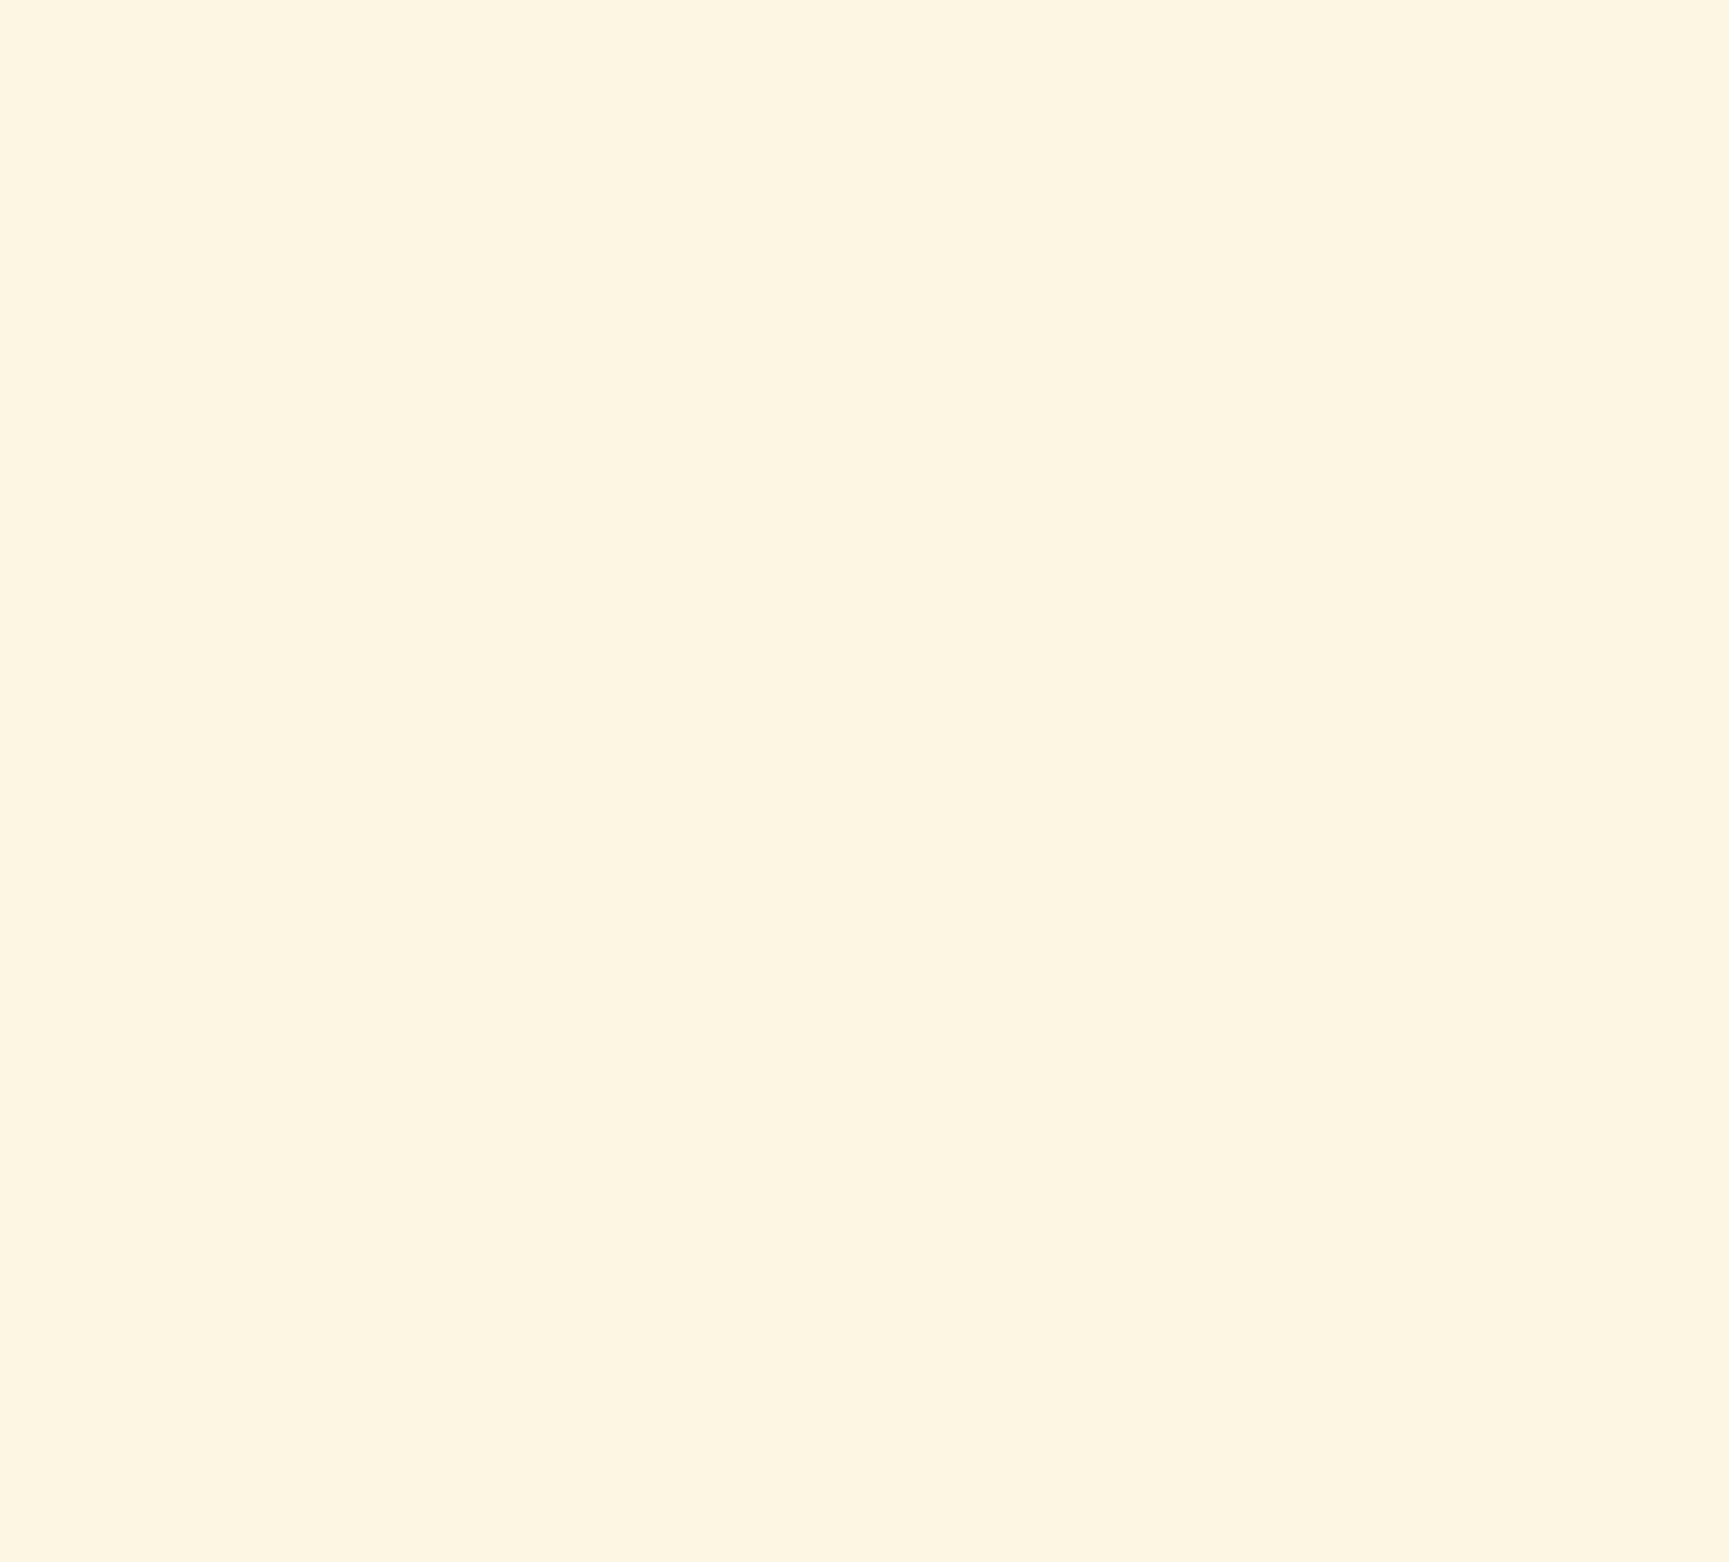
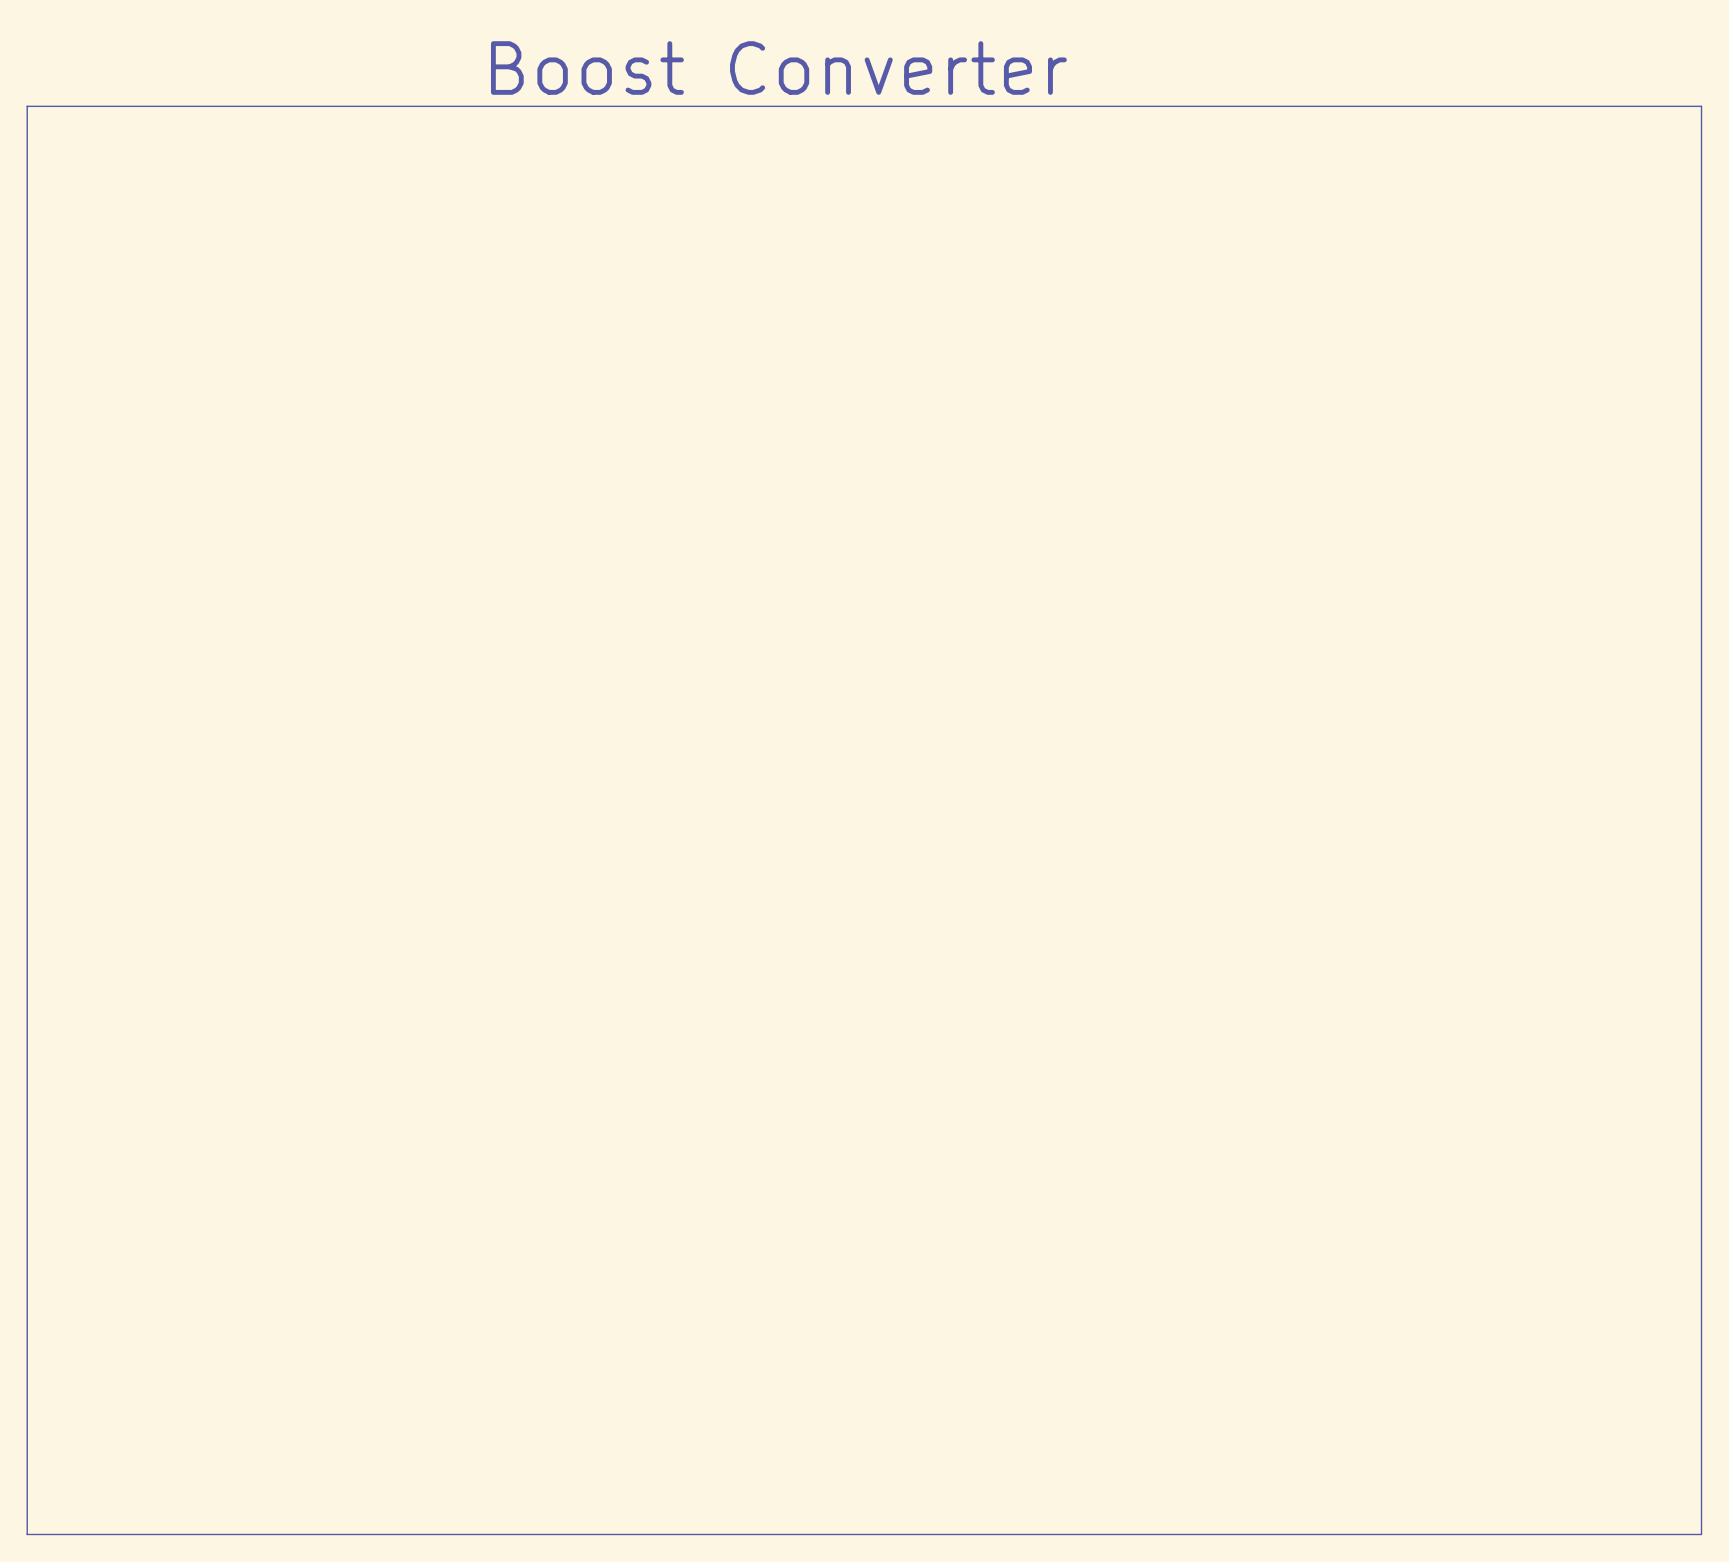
text: none -> Boost Converter (778, 68)
line: none -> (27, 106) (1701, 106) (1701, 1534) (27, 1534) (27, 106)

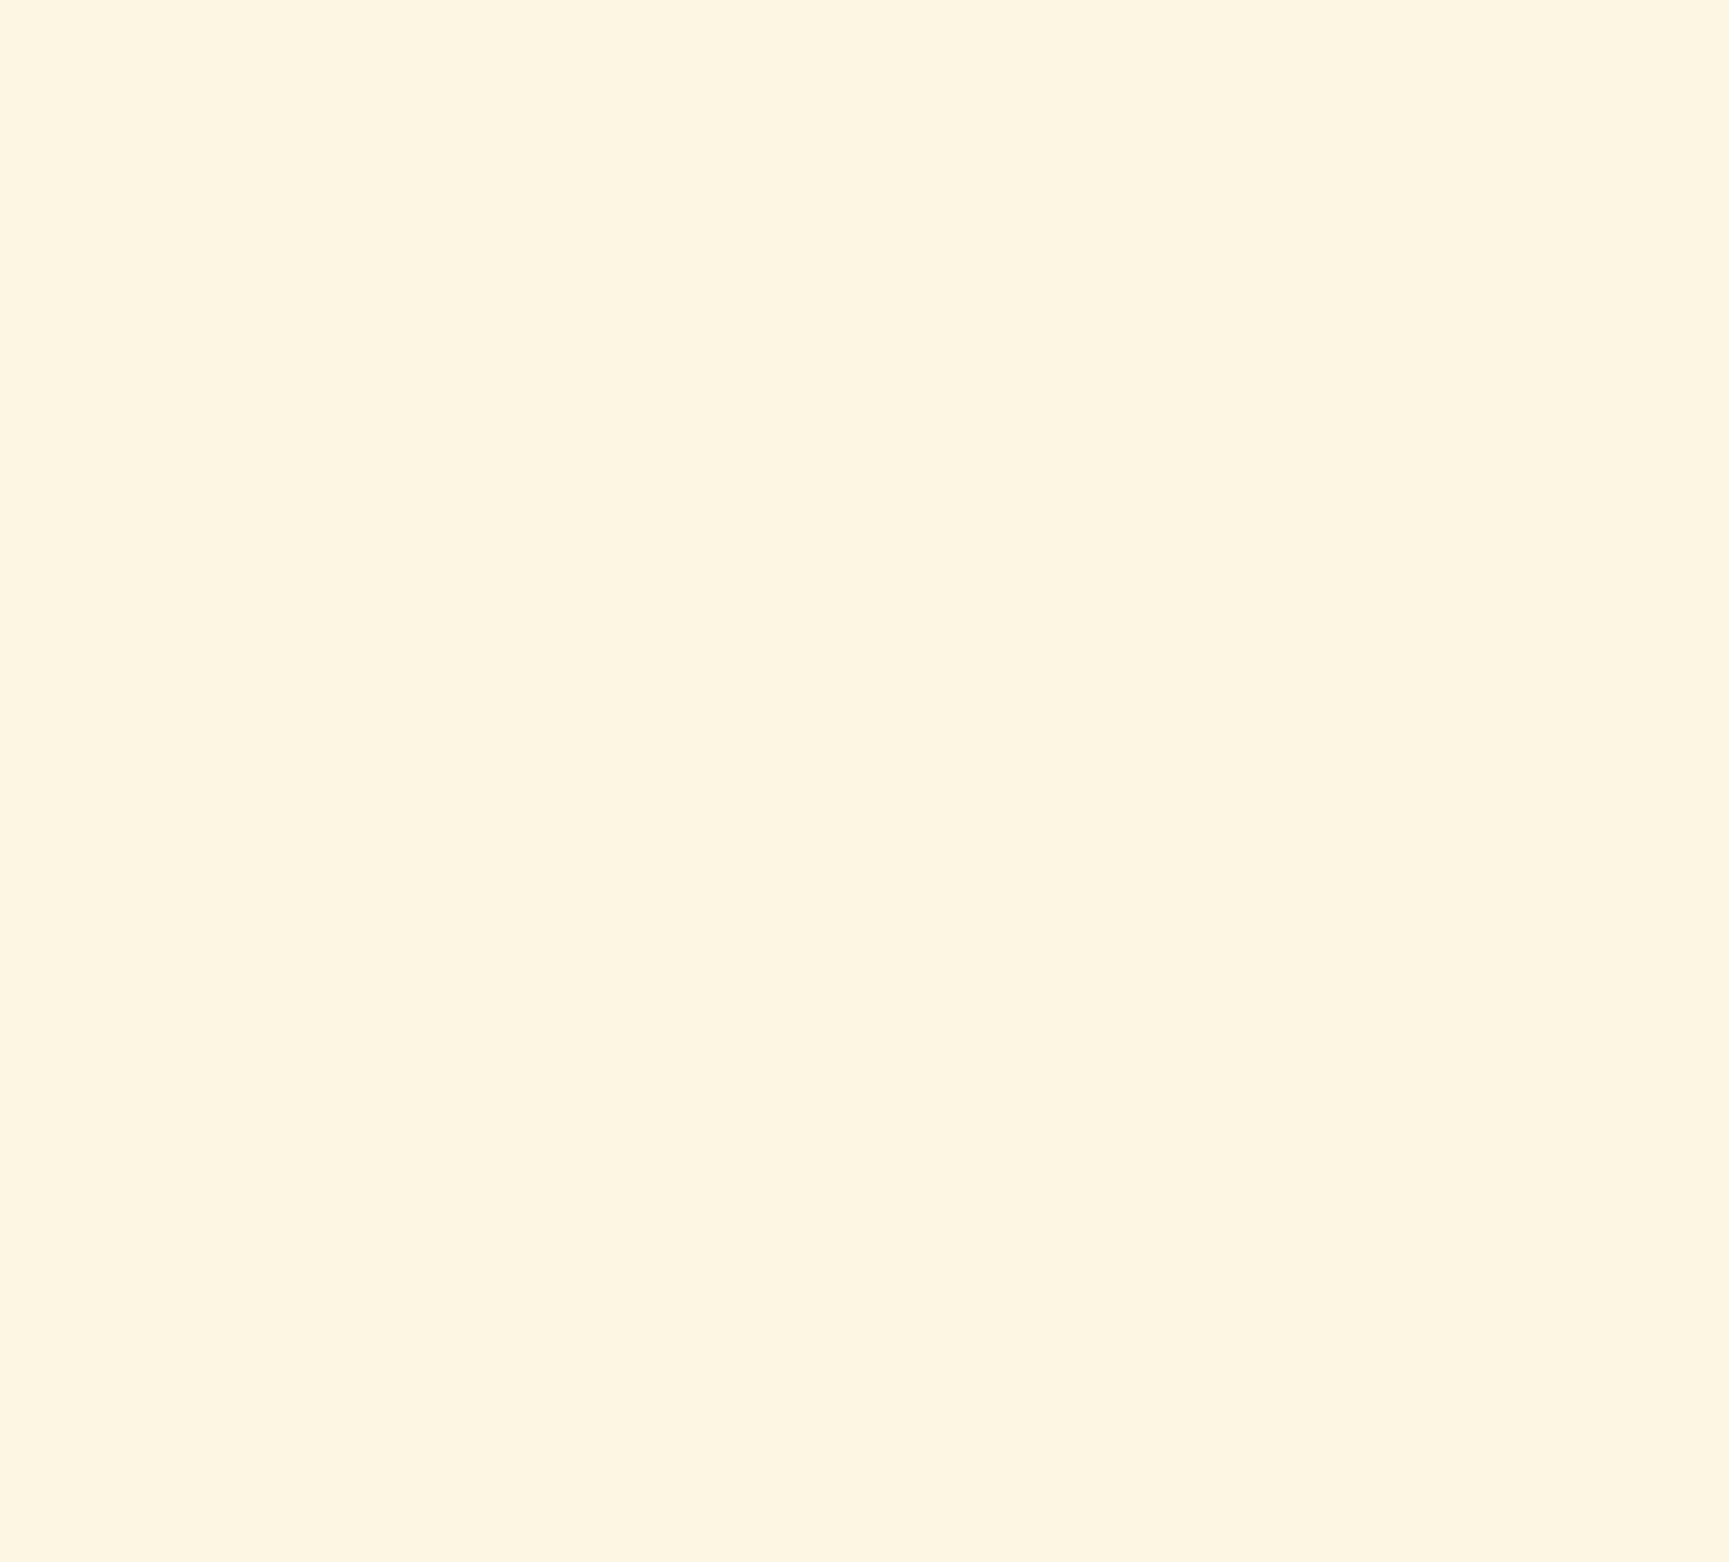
text: Boost Converter (778, 68) -> none
line: (27, 106) (1701, 106) (1701, 1534) (27, 1534) (27, 106) -> none

